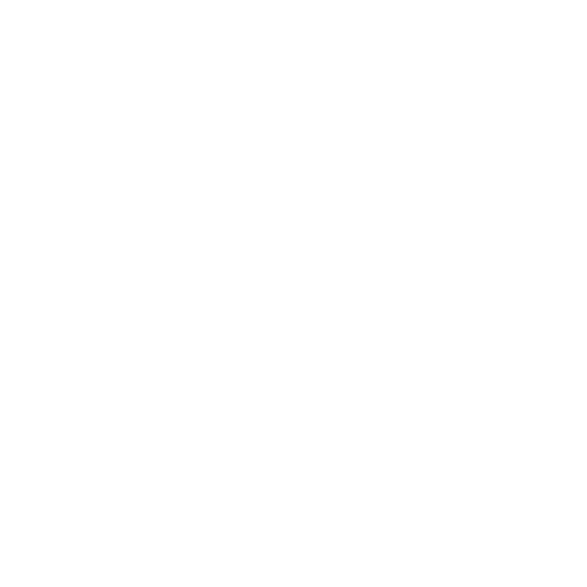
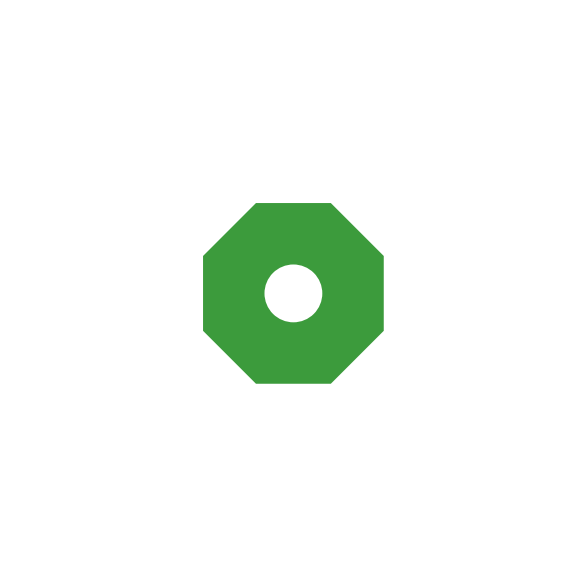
part: none -> (293, 293)

